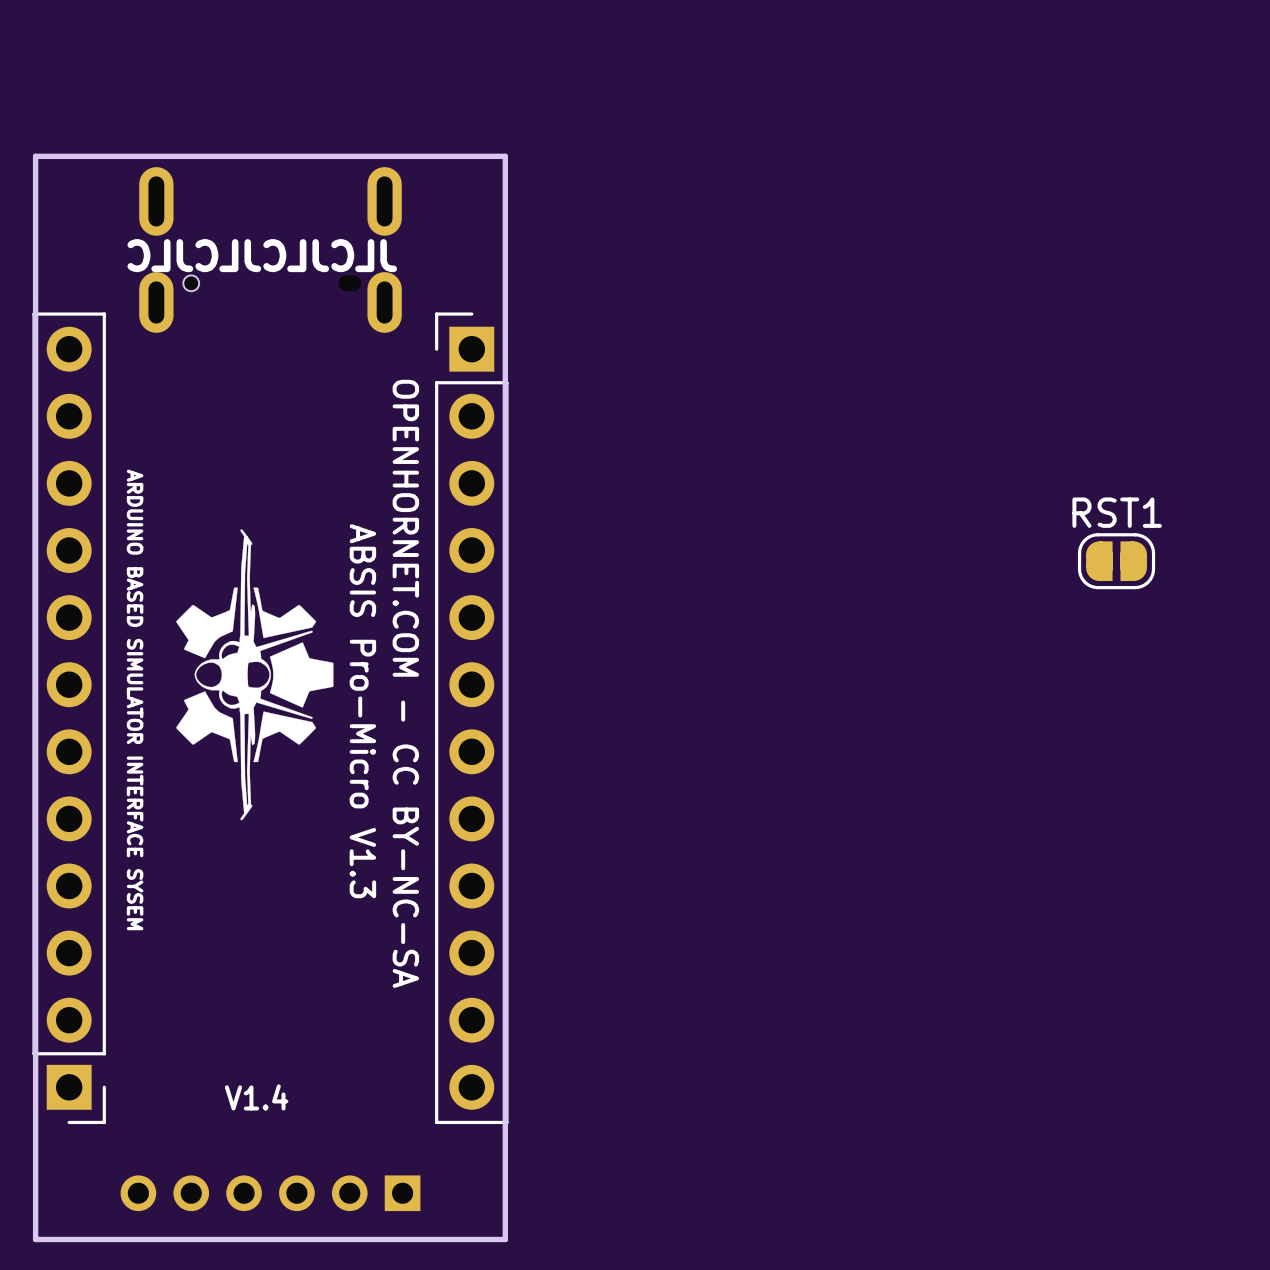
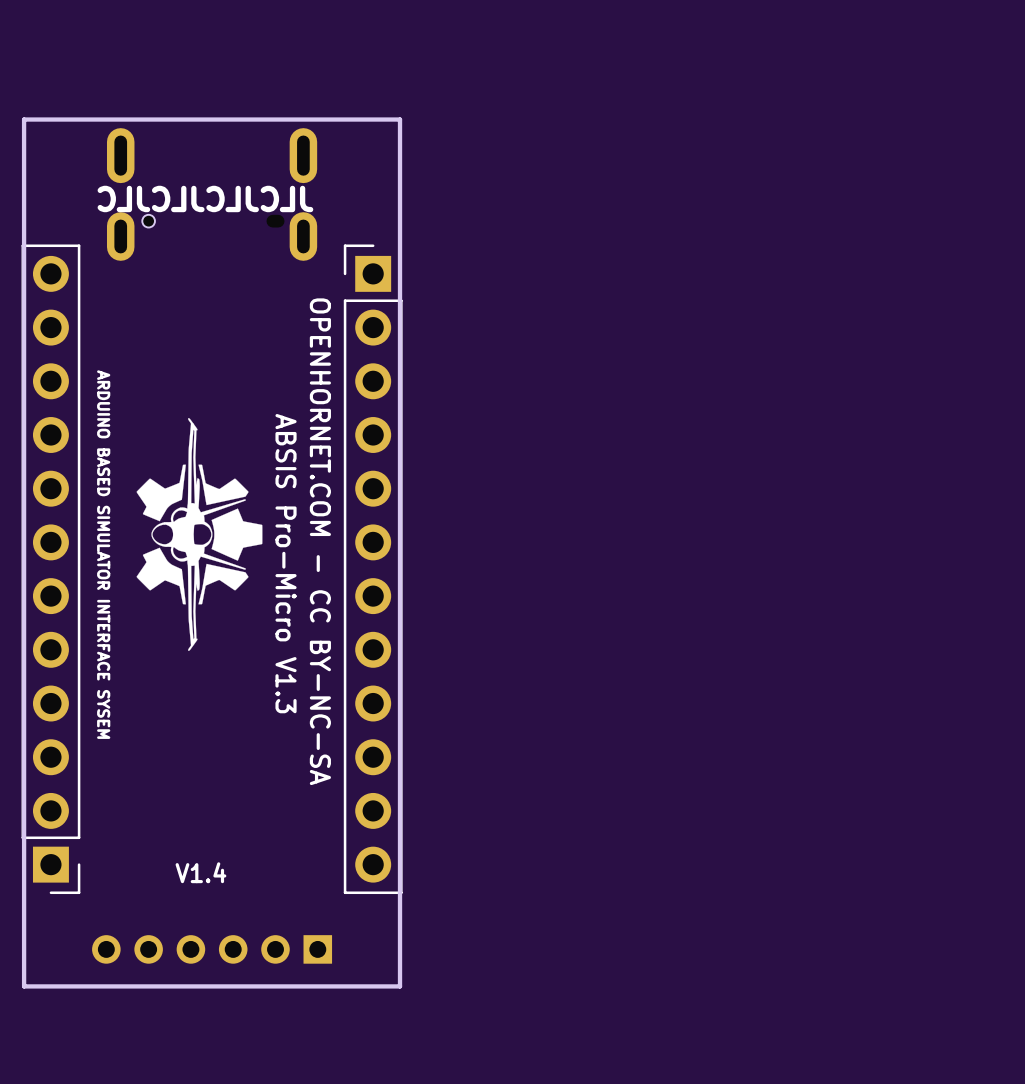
RST1: (1116, 561) -> none

